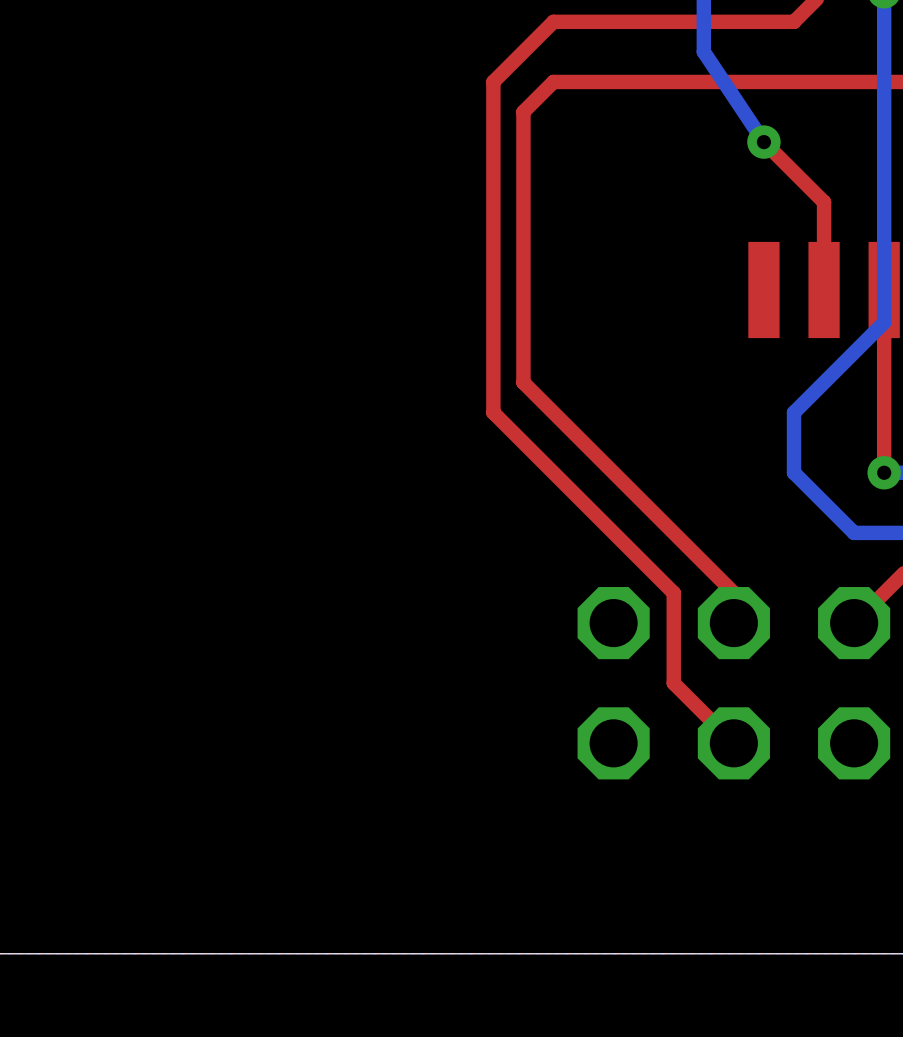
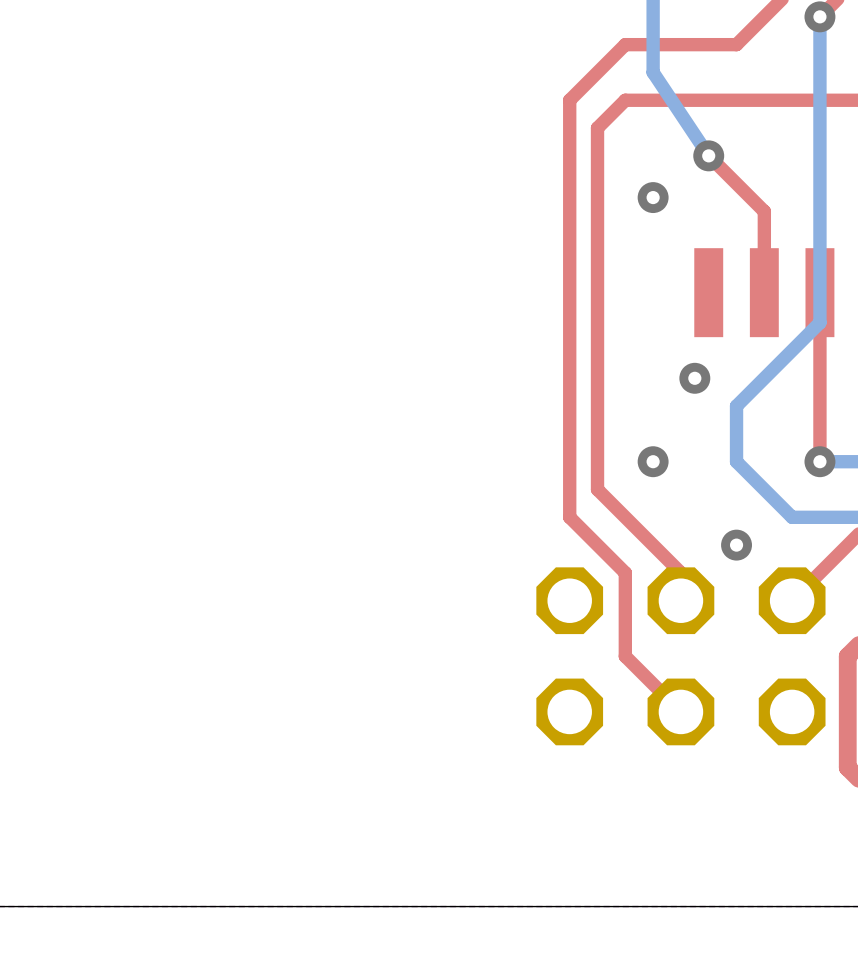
top track: (673, 21) (553, 21) (493, 81) (493, 412) (613, 532) -> (625, 44) (569, 100) (569, 517)
top track: (673, 81) (553, 81) (523, 112) (523, 382) (643, 502) -> (625, 100) (597, 128) (597, 489)
via: none -> (653, 197)
via: none -> (694, 378)
via: none -> (653, 461)
via: none -> (736, 545)

